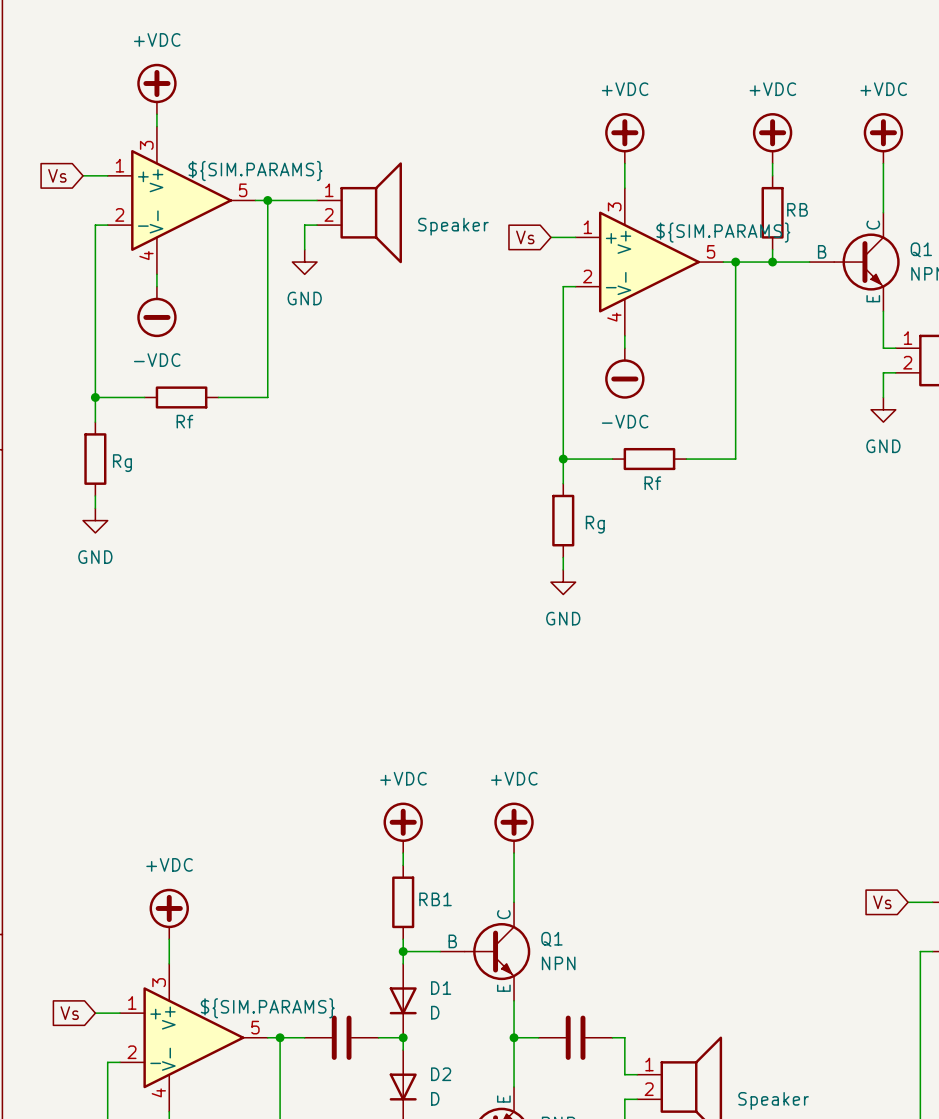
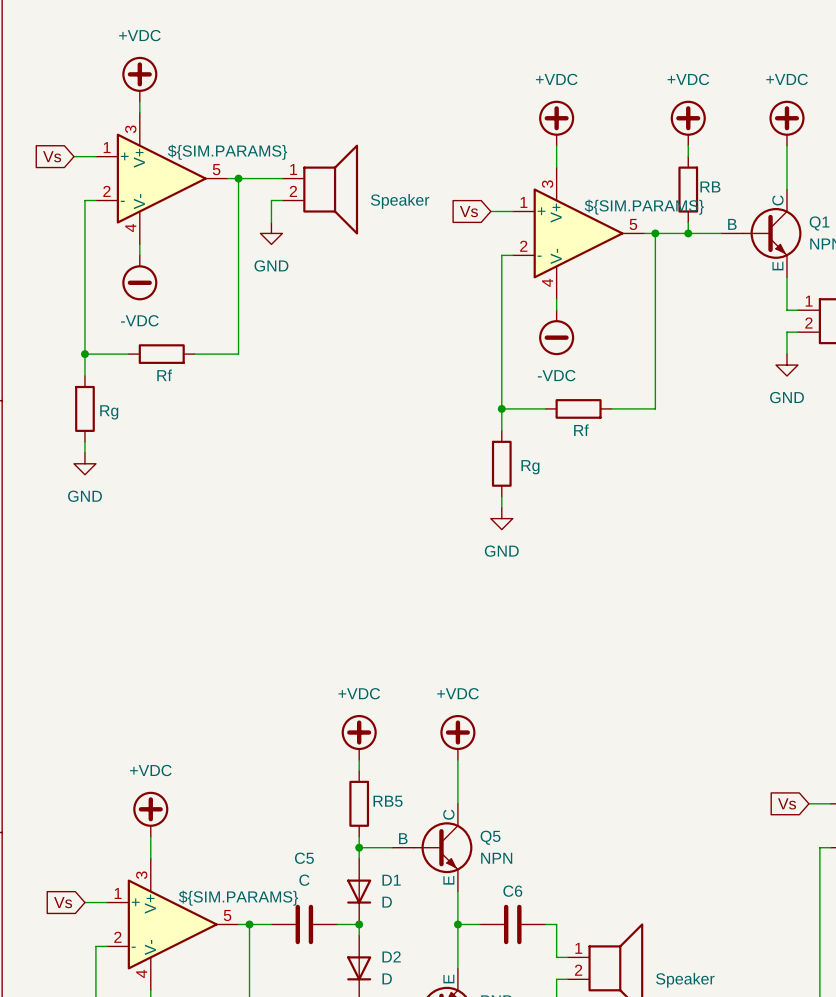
RB1 name: RB1 (435, 899) -> RB5 (388, 801)
Q1 name: Q1 (551, 939) -> Q5 (490, 837)
C5 name: none -> C5 (304, 858)
C5 value: none -> C (304, 880)
C6 name: none -> C6 (512, 891)

